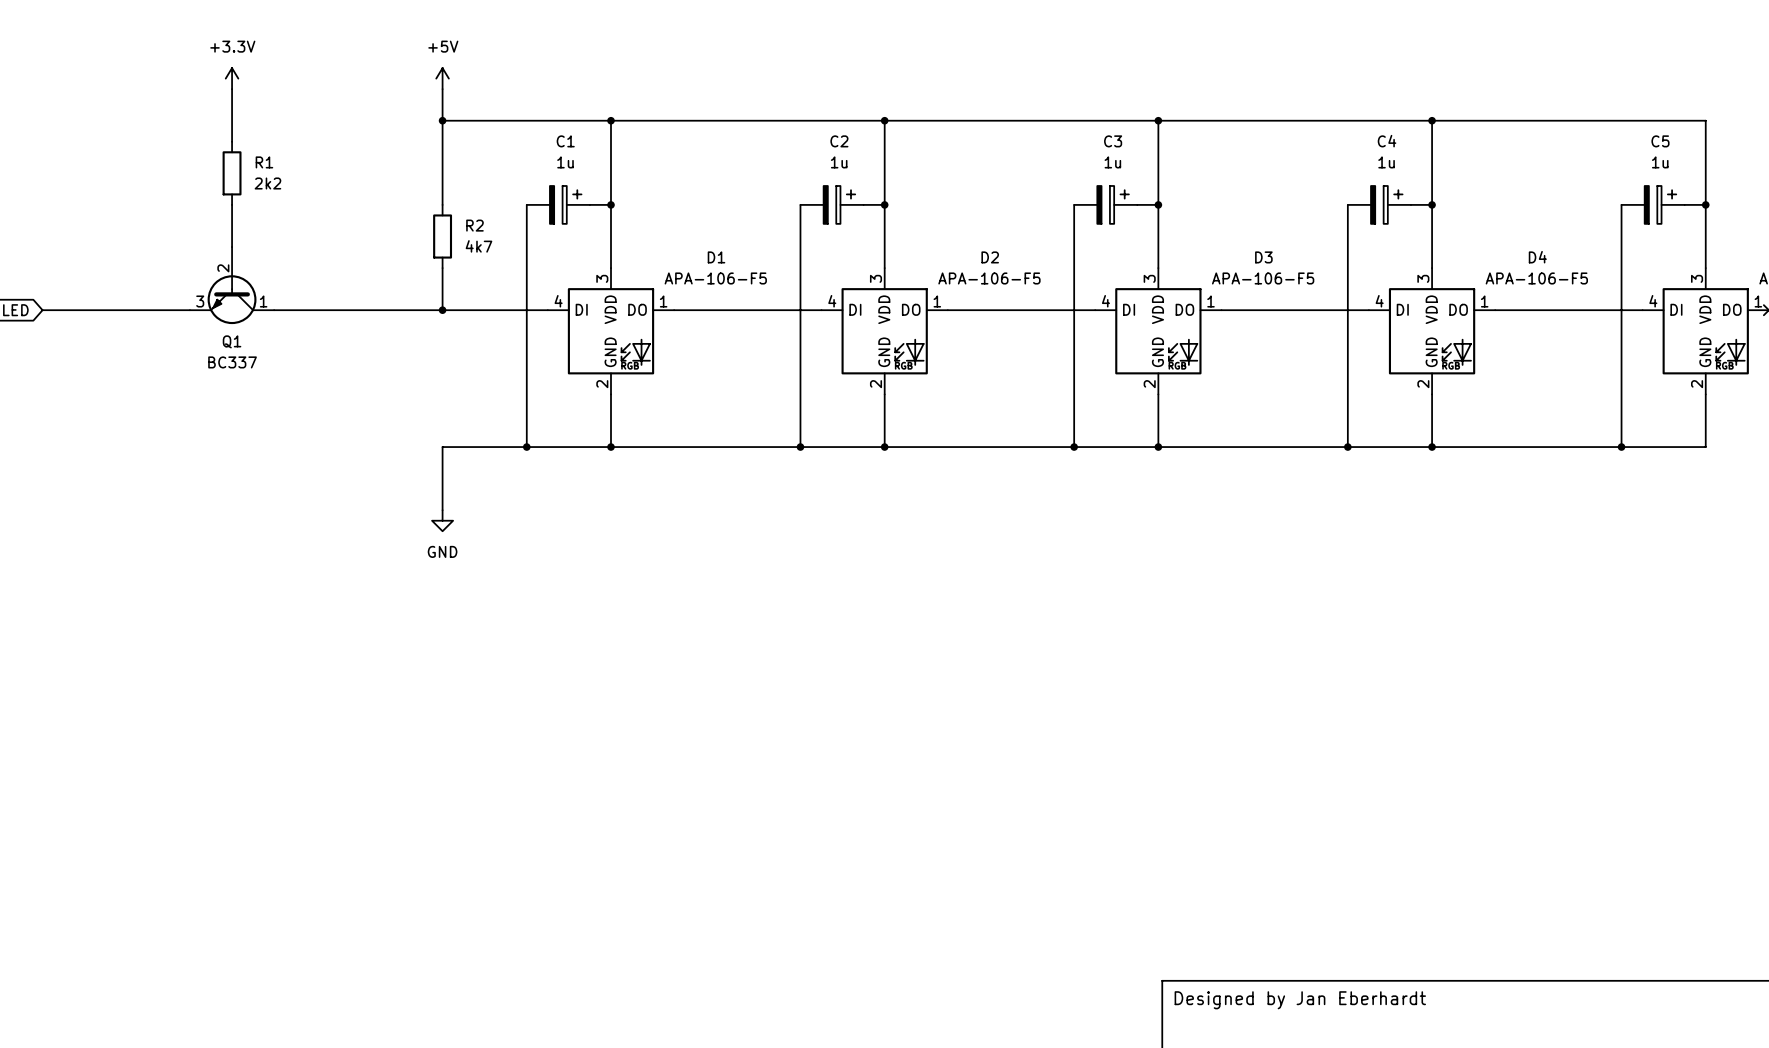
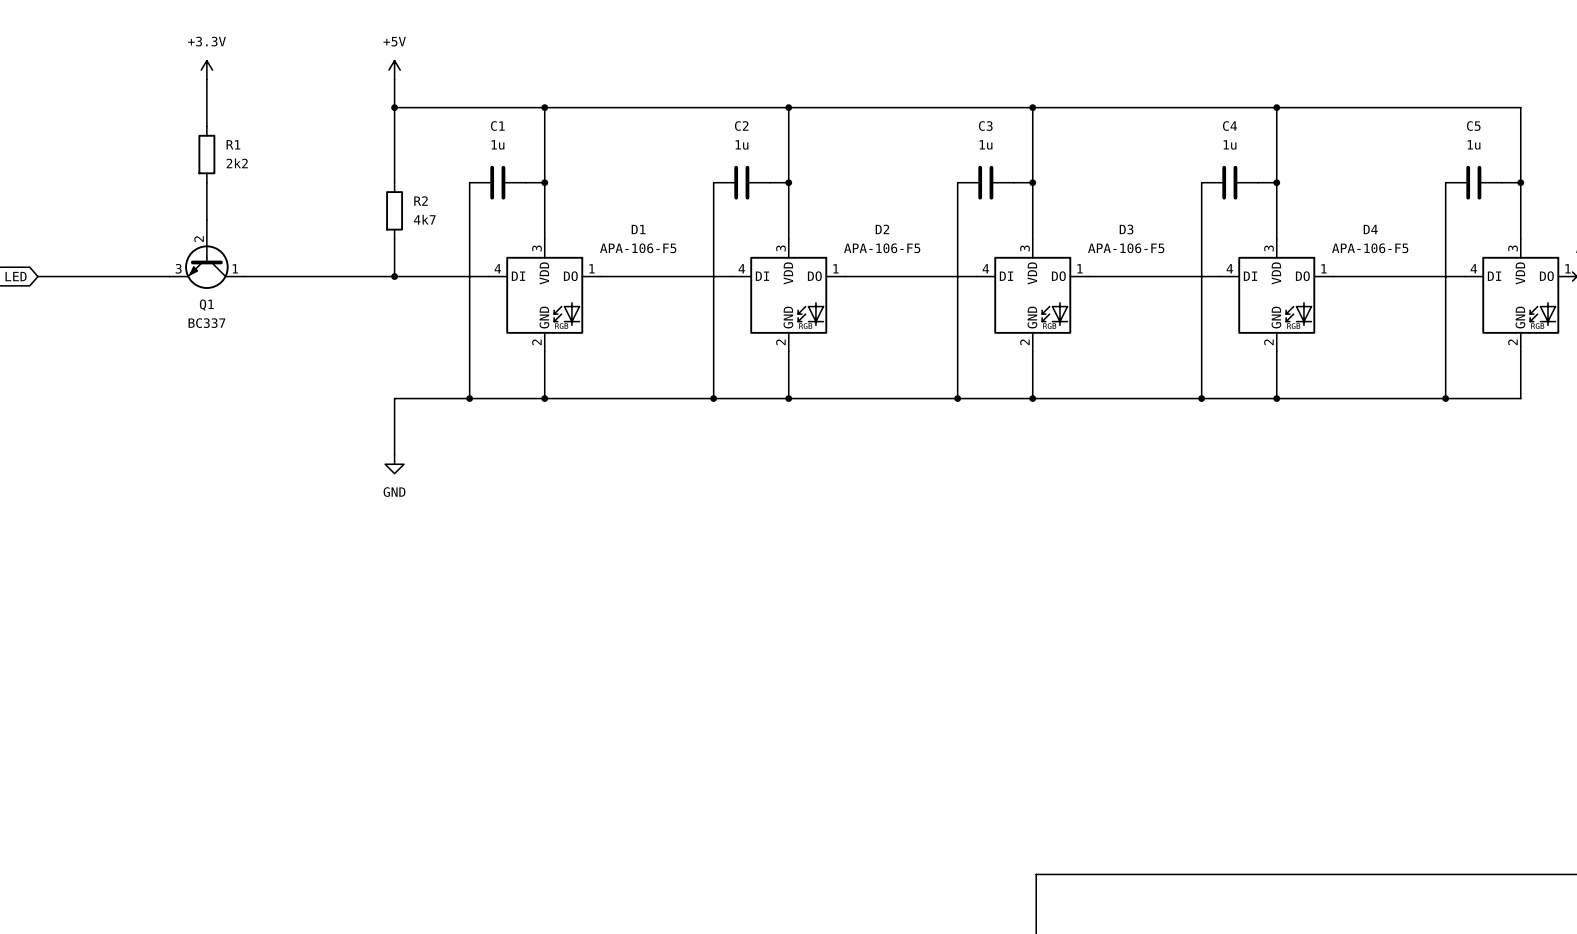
C1 symbol: [526, 185, 590, 224] -> [469, 165, 526, 200]
C2 symbol: [800, 185, 864, 224] -> [713, 165, 770, 200]
C3 symbol: [1074, 185, 1138, 224] -> [957, 165, 1014, 200]
C4 symbol: [1347, 185, 1412, 224] -> [1201, 165, 1258, 200]
C5 symbol: [1621, 185, 1685, 224] -> [1445, 165, 1502, 200]
text: Designed by Jan Eberhardt (1300, 1000) -> none

